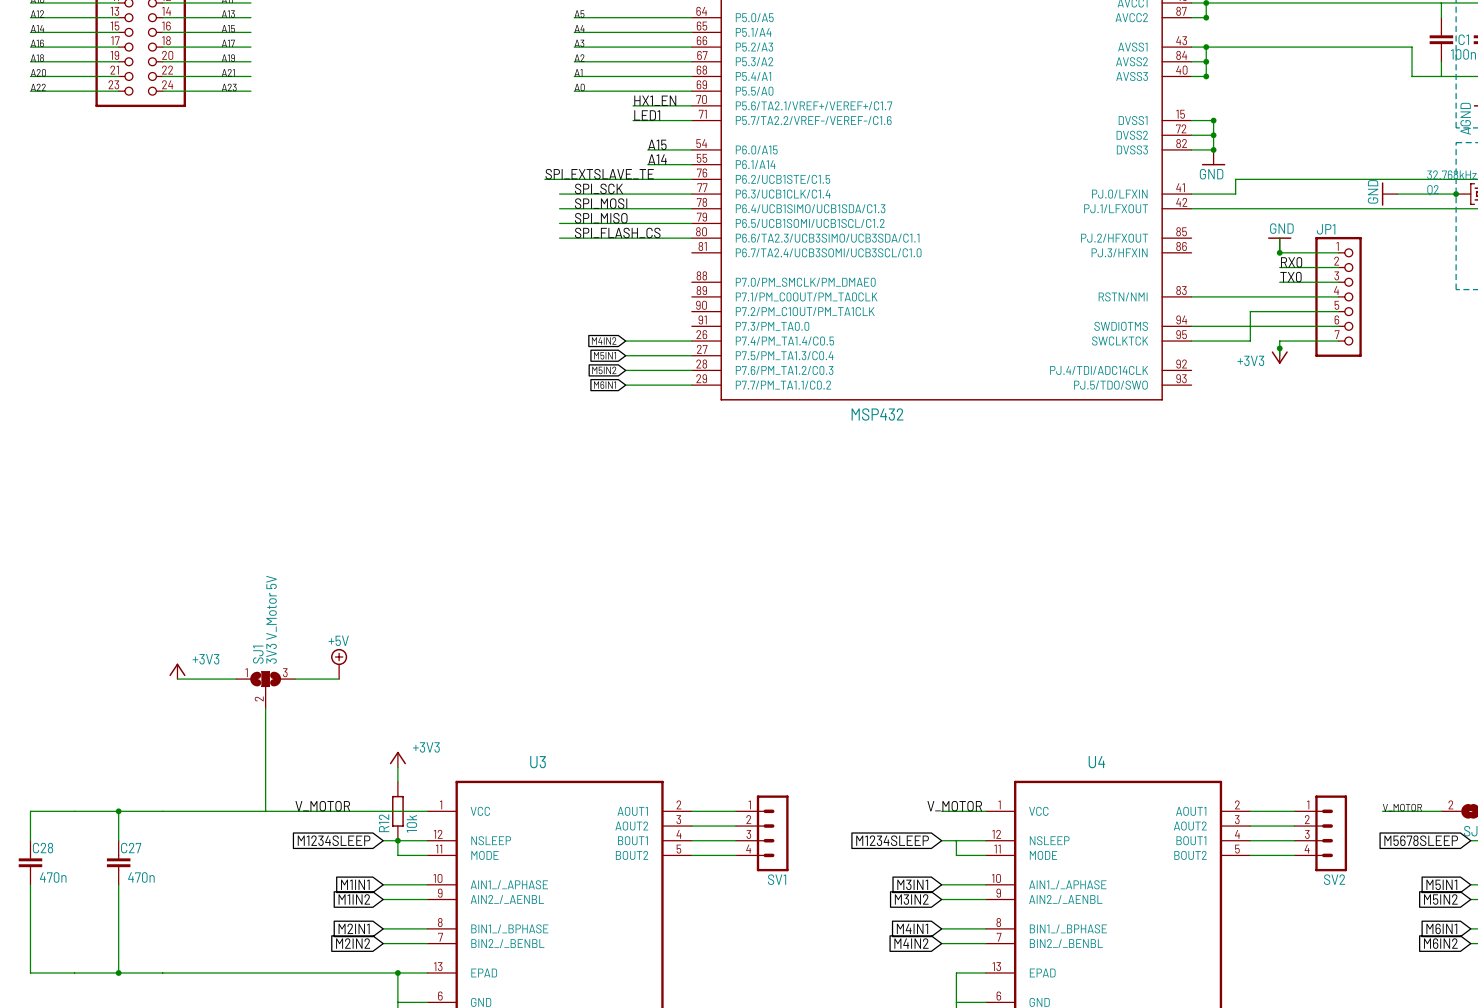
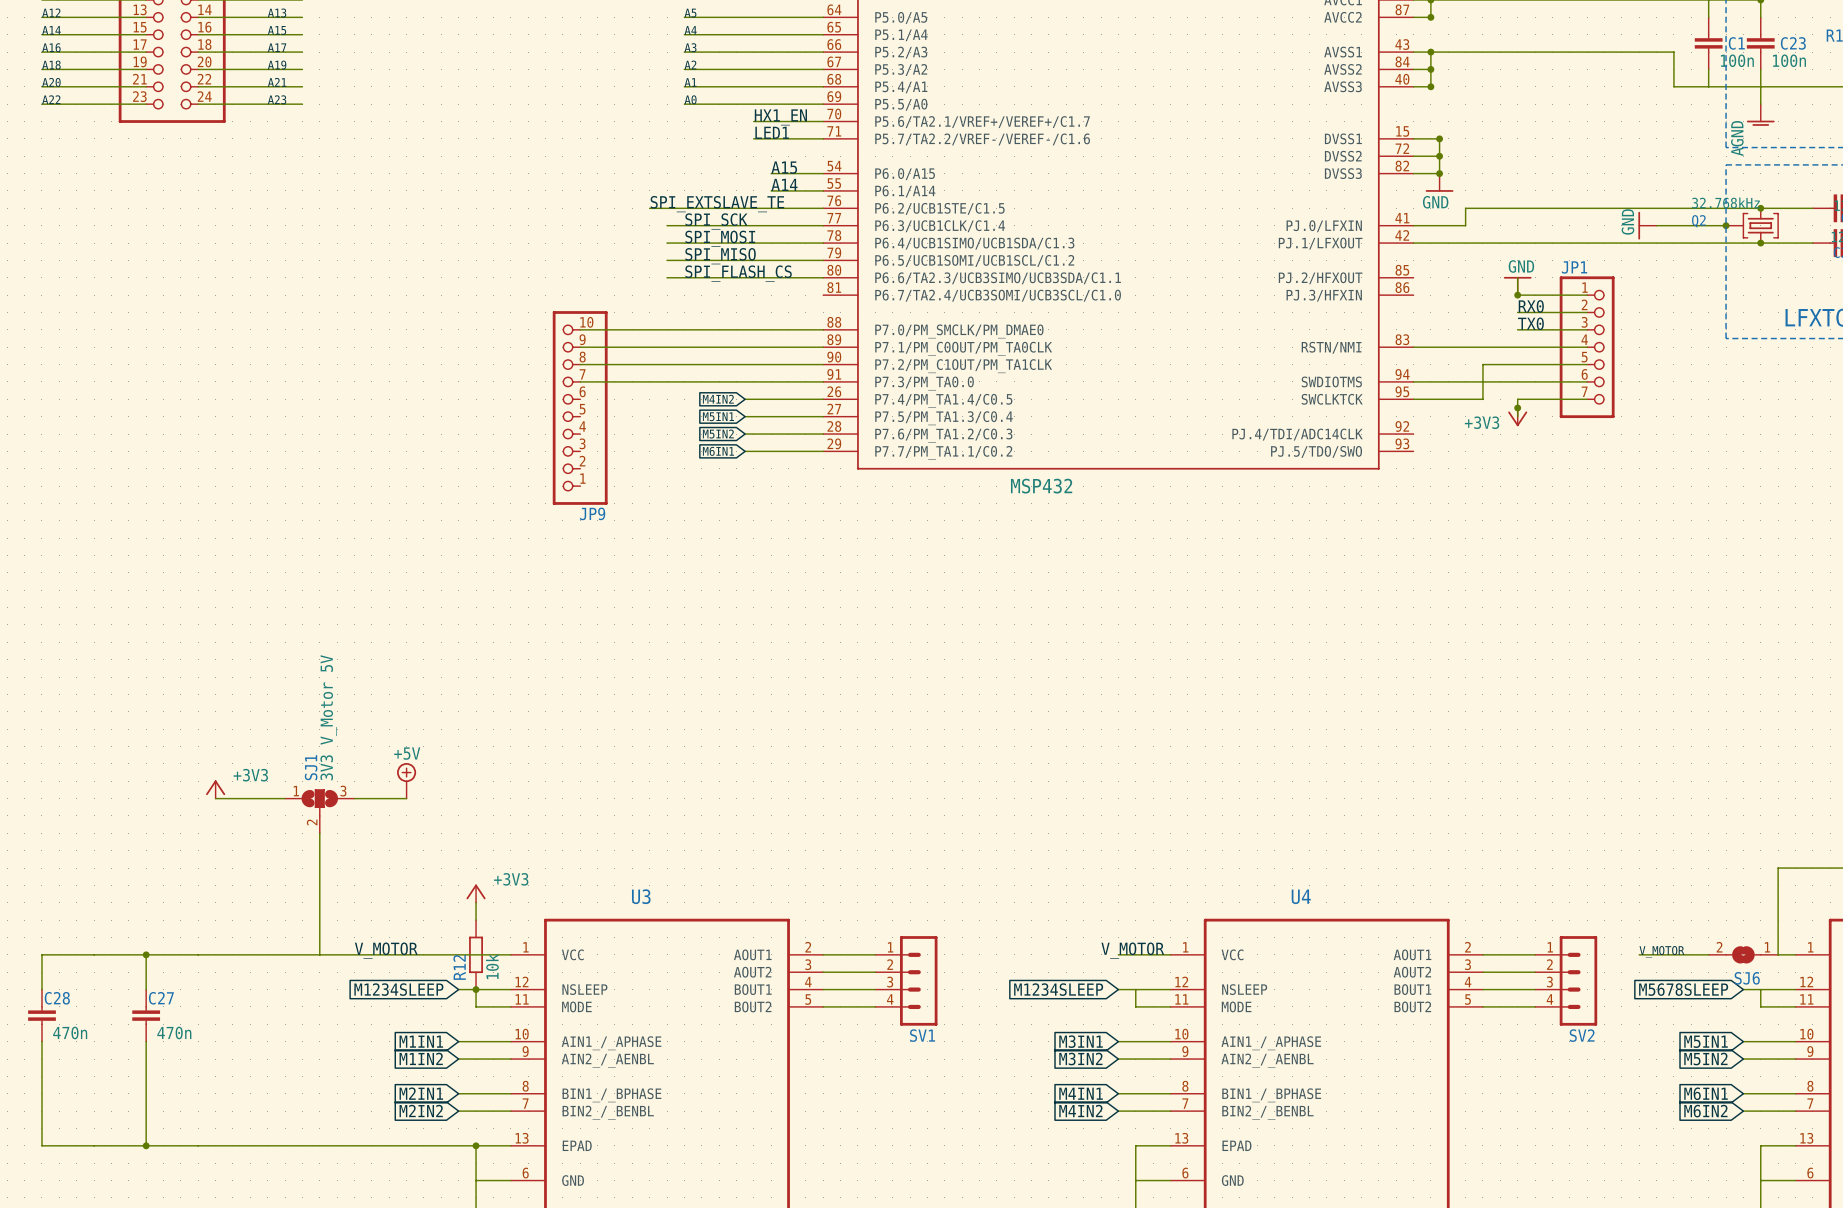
wire: none -> (580, 329) (823, 329)
wire: none -> (580, 347) (823, 347)
wire: none -> (580, 364) (823, 364)
wire: none -> (580, 381) (823, 381)
JP9: none -> (580, 407)

